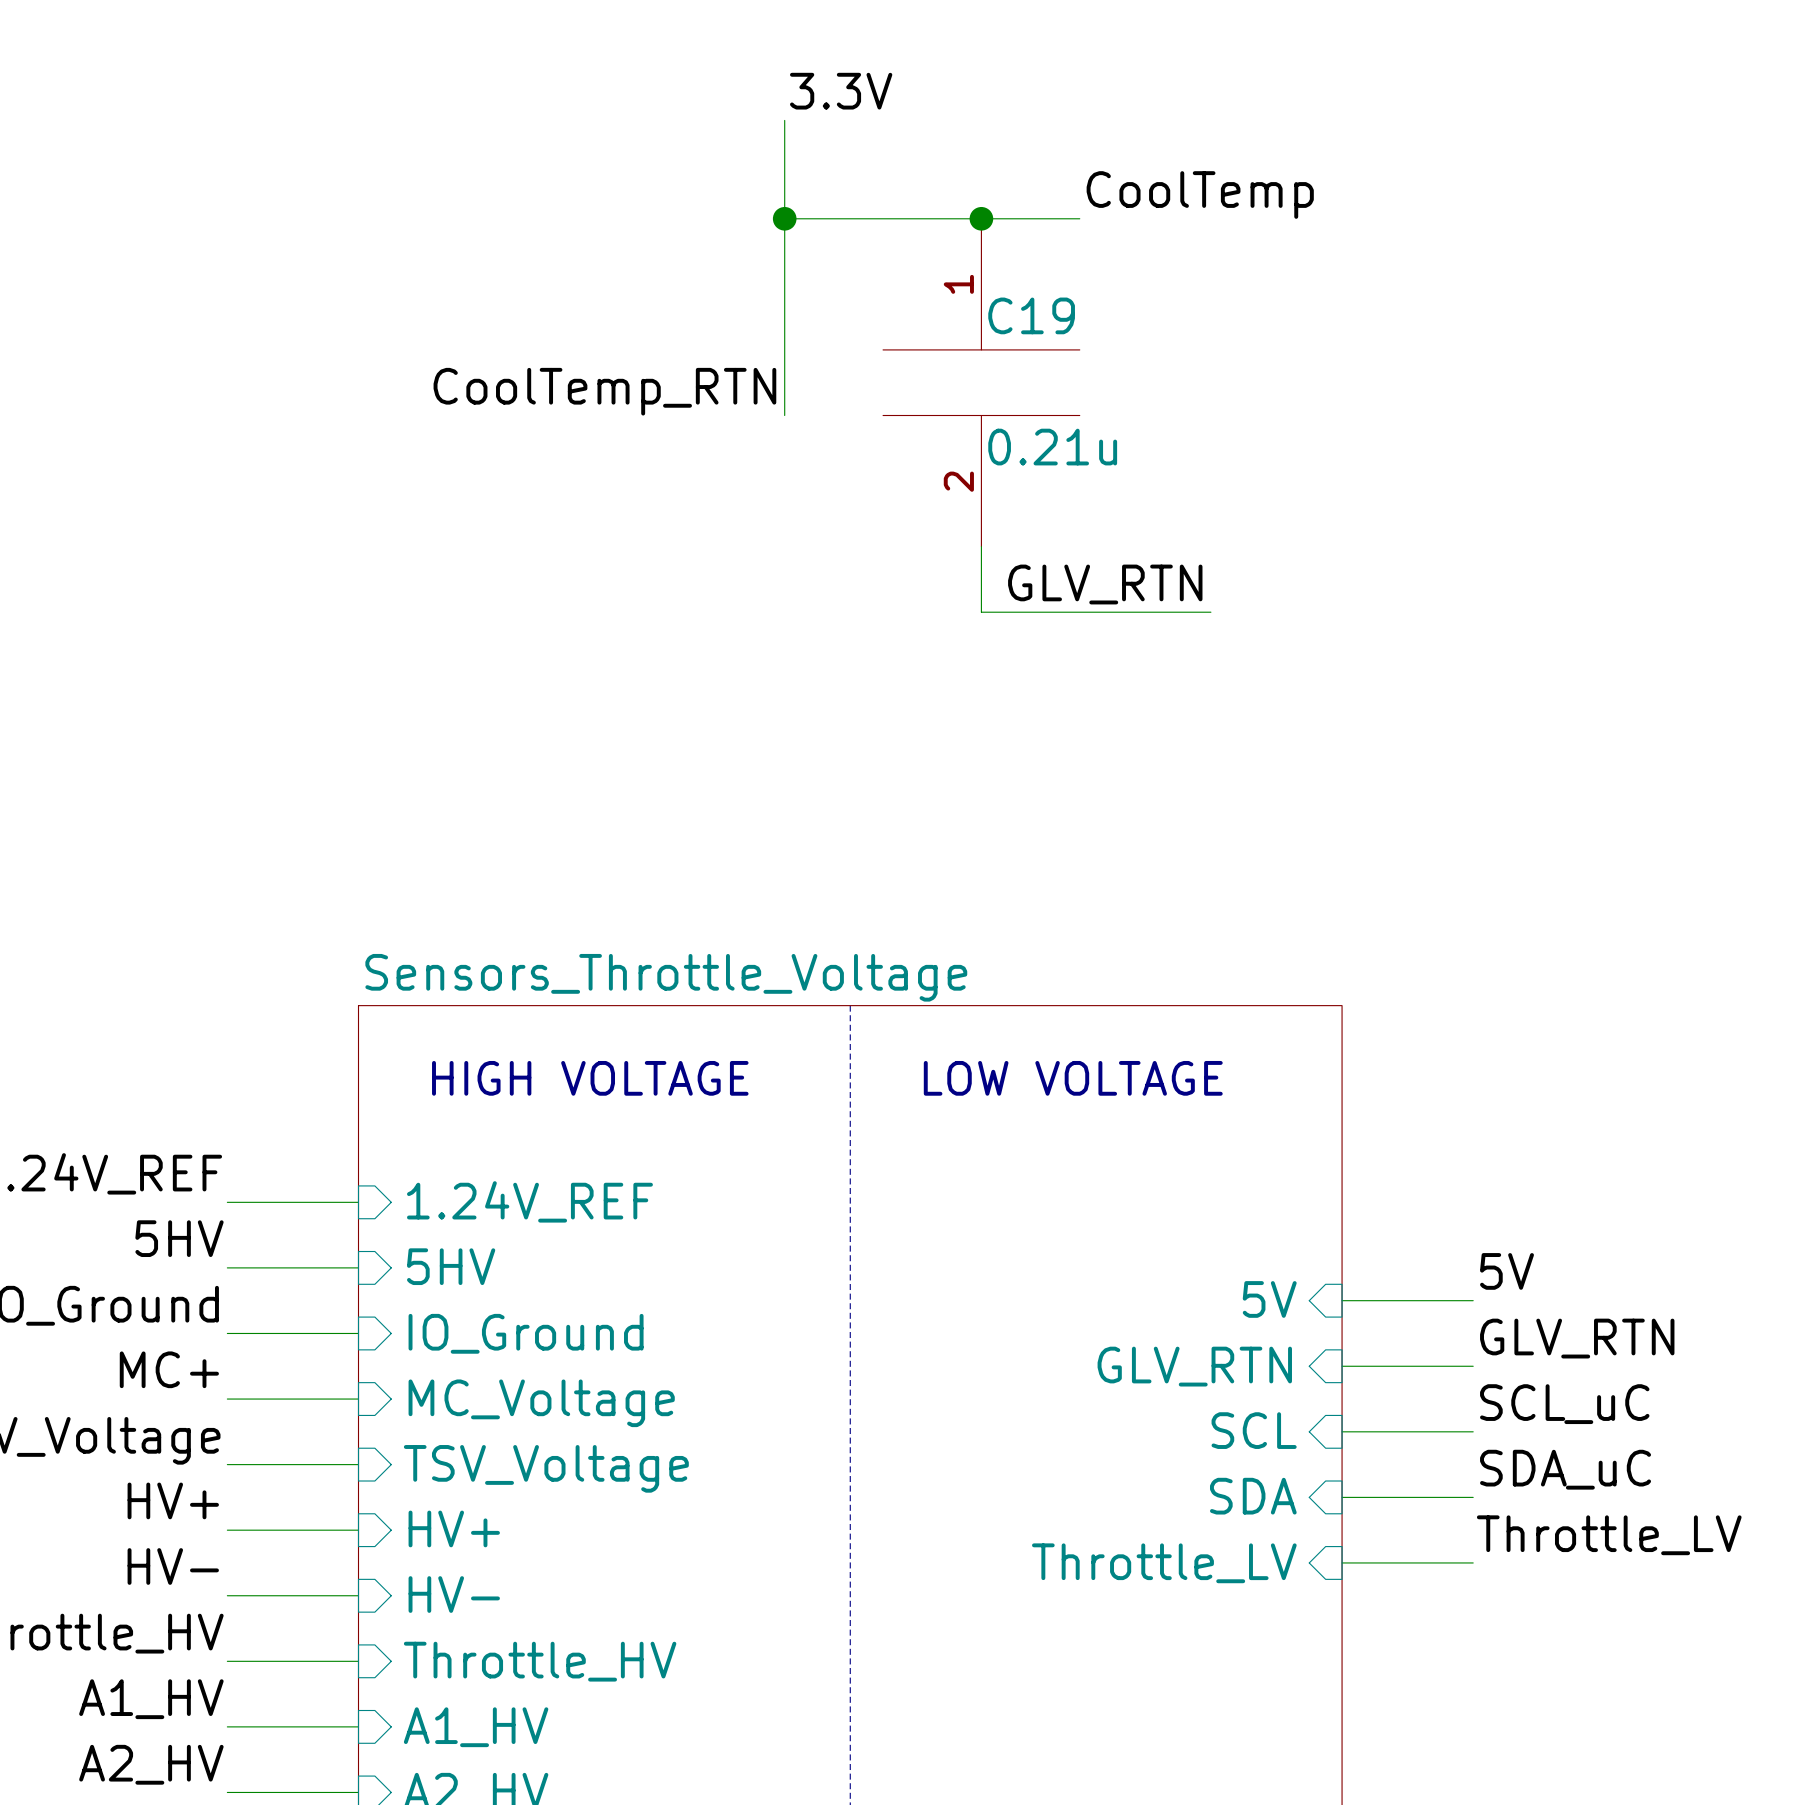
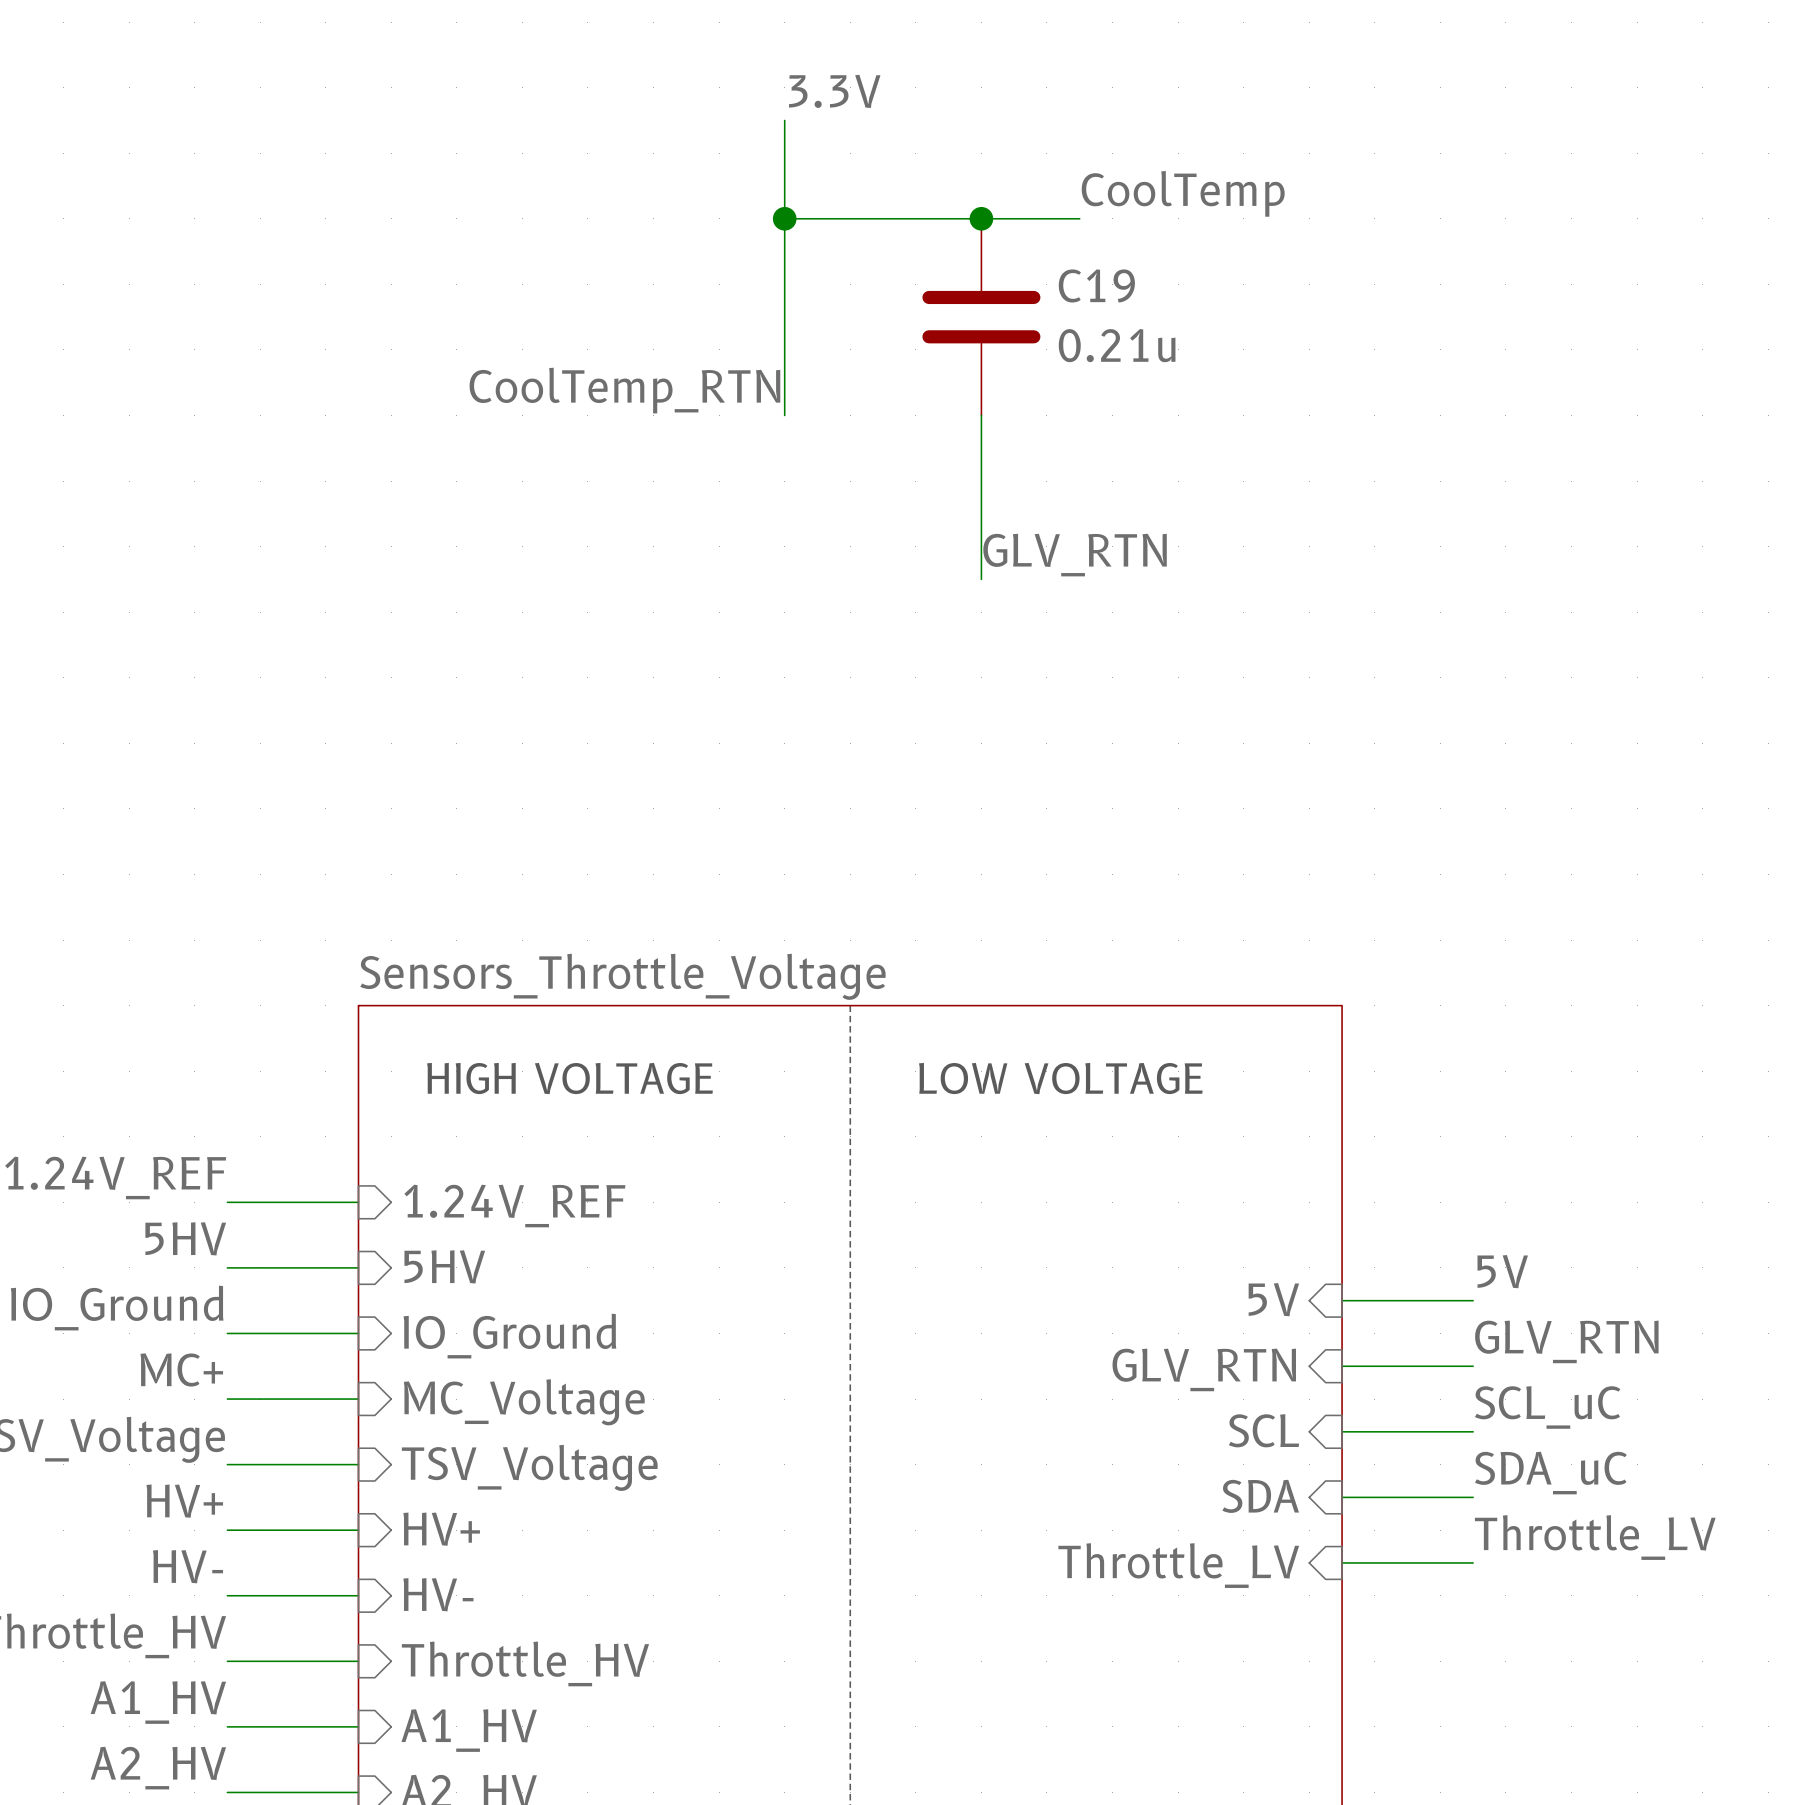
C19 symbol: [883, 218, 1080, 547] -> [922, 218, 1041, 416]
C19 name position: C19 (1031, 315) -> C19 (1096, 285)
C19 value position: 0.21u (1052, 447) -> 0.21u (1117, 345)
wire: (981, 579) (981, 612) (1210, 612) -> none
label position: GLV_RTN (1105, 584) -> GLV_RTN (1075, 555)

